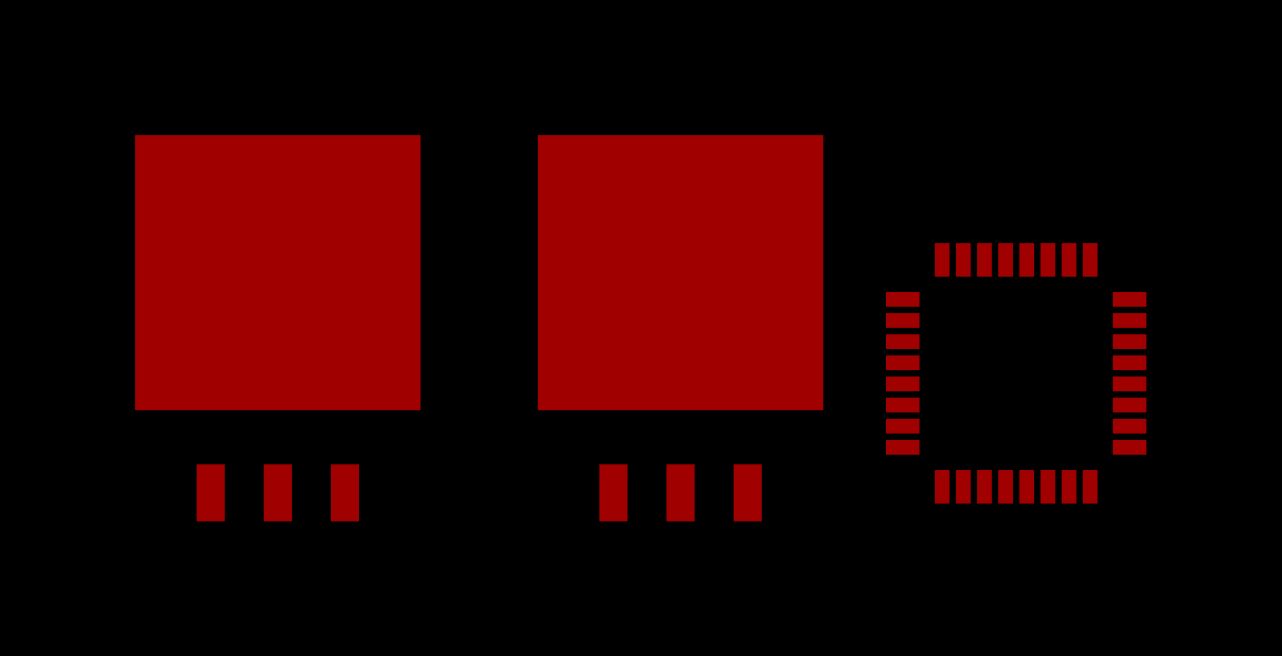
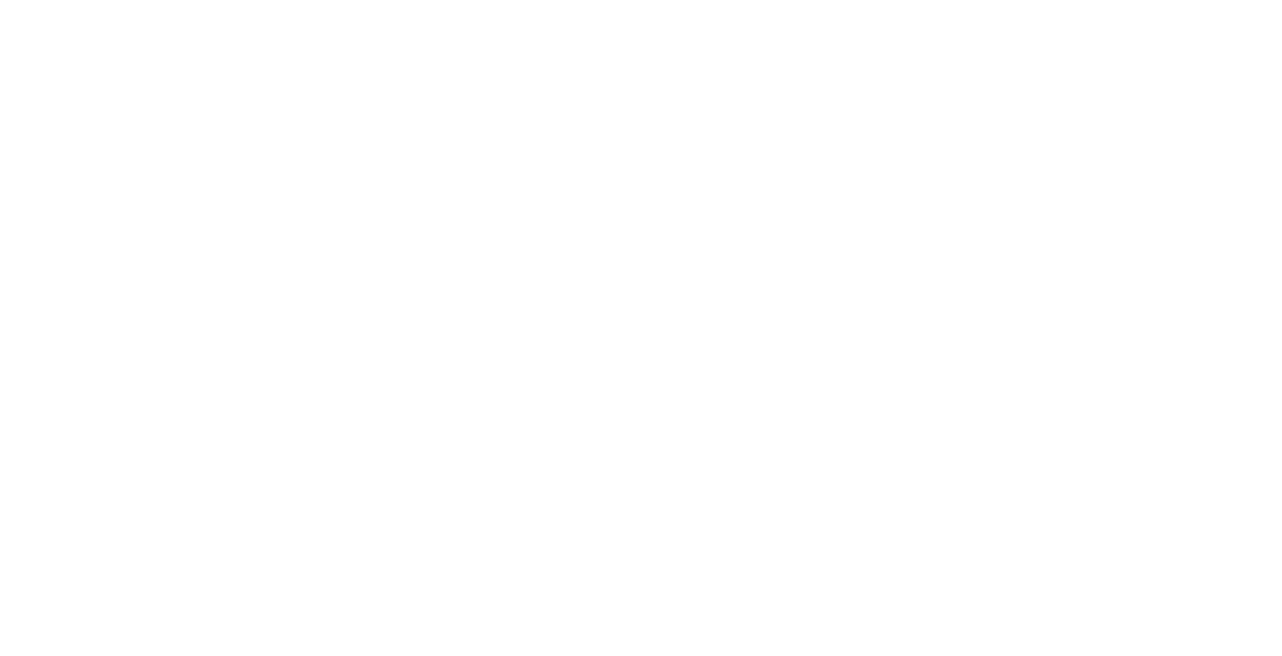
part: (277, 328) -> none
part: (680, 328) -> none
part: (1016, 373) -> none

